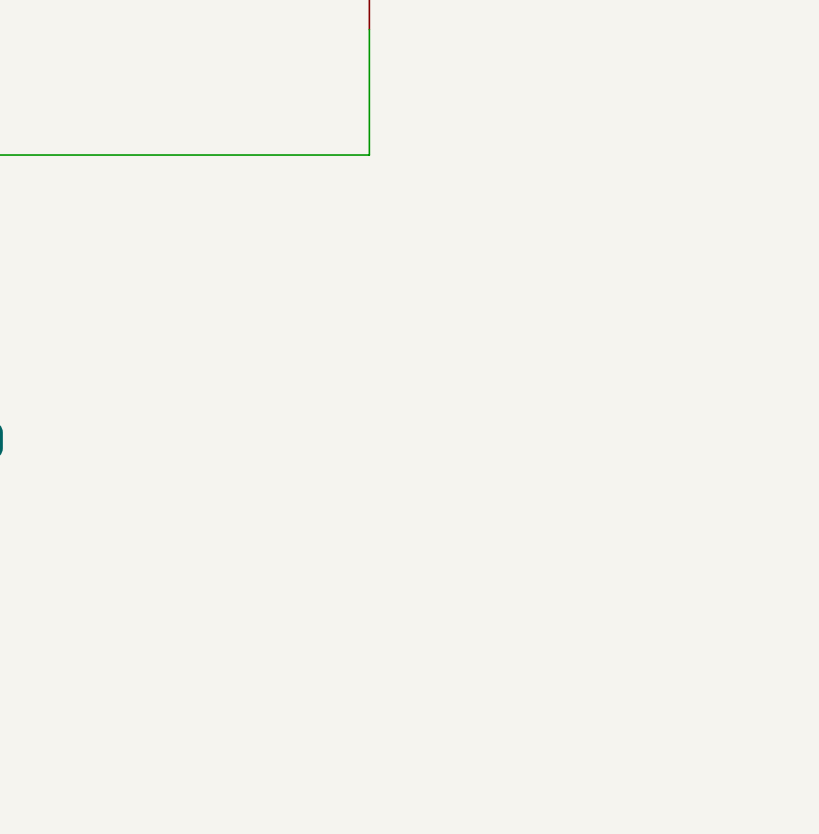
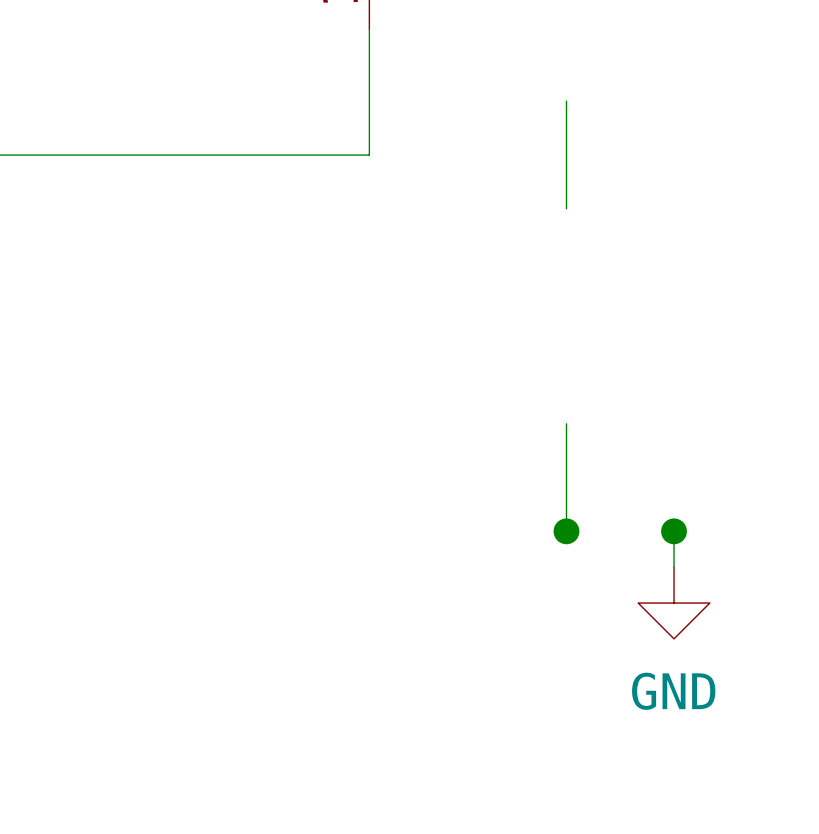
wire: none -> (566, 101) (566, 208)
wire: none -> (566, 423) (566, 531)
junction: none -> (566, 531)
wire: none -> (674, 531) (674, 567)
junction: none -> (674, 531)
power symbol: none -> GND (674, 603)

